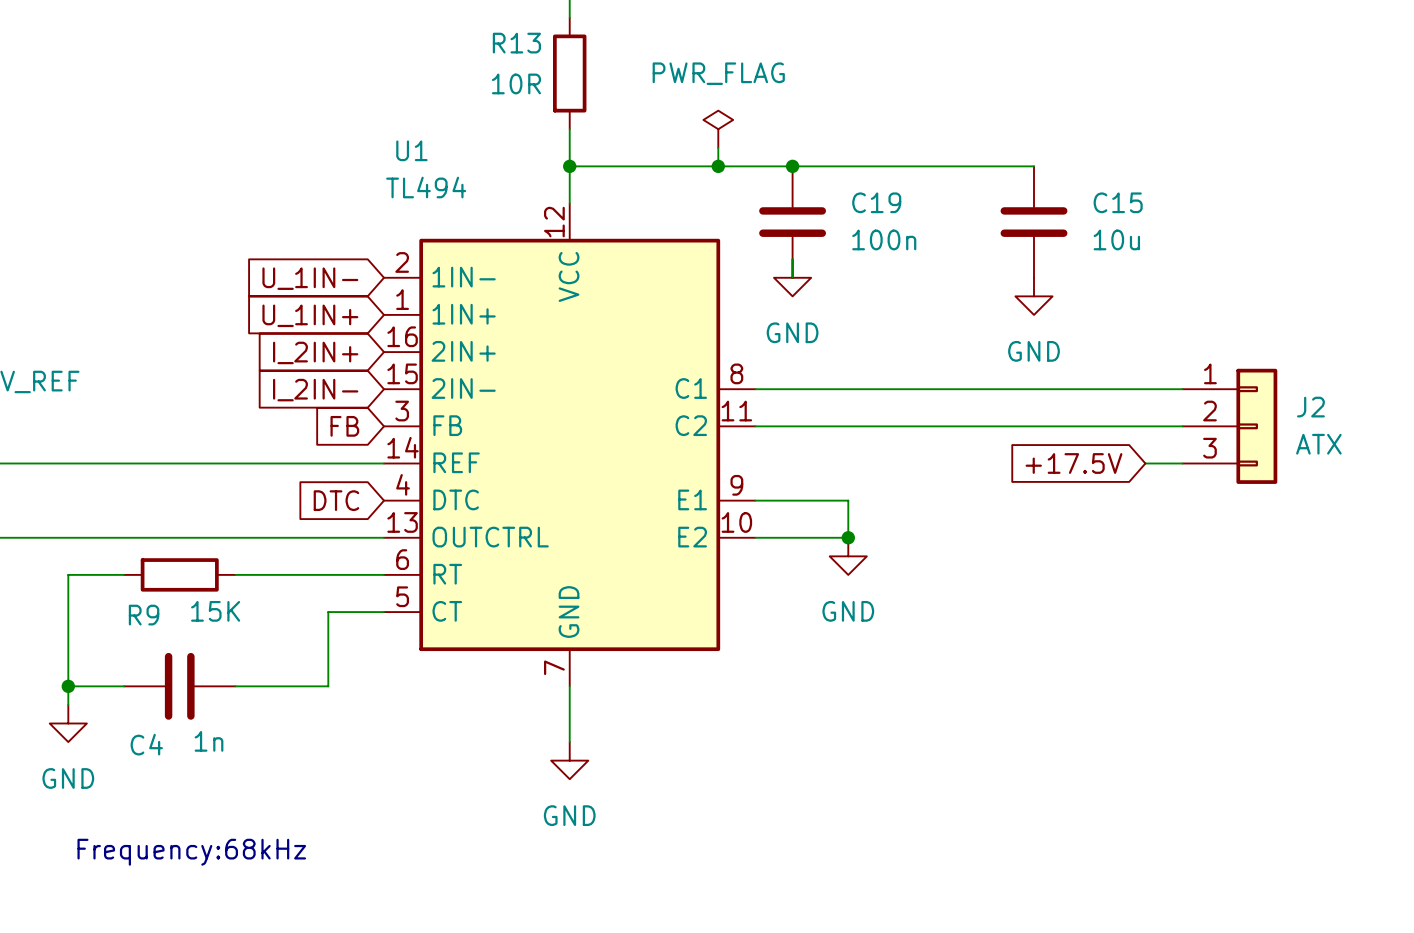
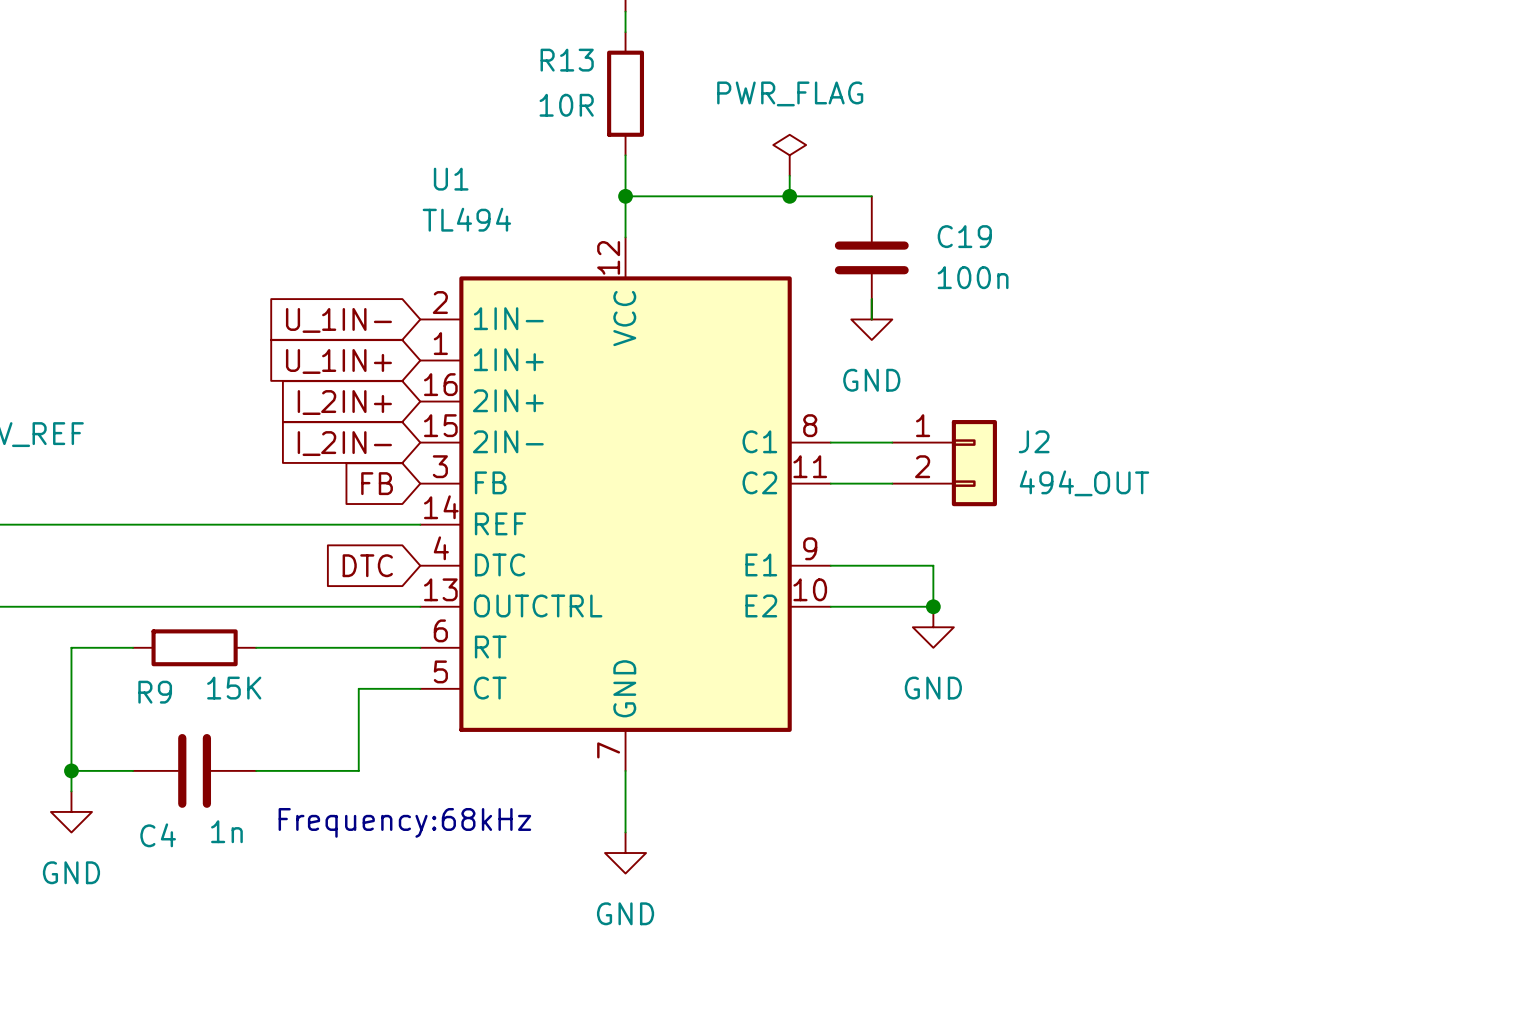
wire: (792, 166) (1034, 166) -> none
junction: (792, 166) -> none
C15: 10u (1034, 222) -> none
power symbol: GND (1034, 296) -> none
J2 symbol: [1182, 368, 1278, 484] -> [892, 420, 997, 507]
wire: (811, 389) (1182, 389) -> none
wire: (811, 426) (1182, 426) -> none
J2 value: ATX (1318, 444) -> 494_OUT (1084, 483)
global label: +17.5V (1073, 463) -> none
wire: (1145, 463) (1182, 463) -> none
text position: Frequency:68kHz (191, 852) -> Frequency:68kHz (404, 822)

